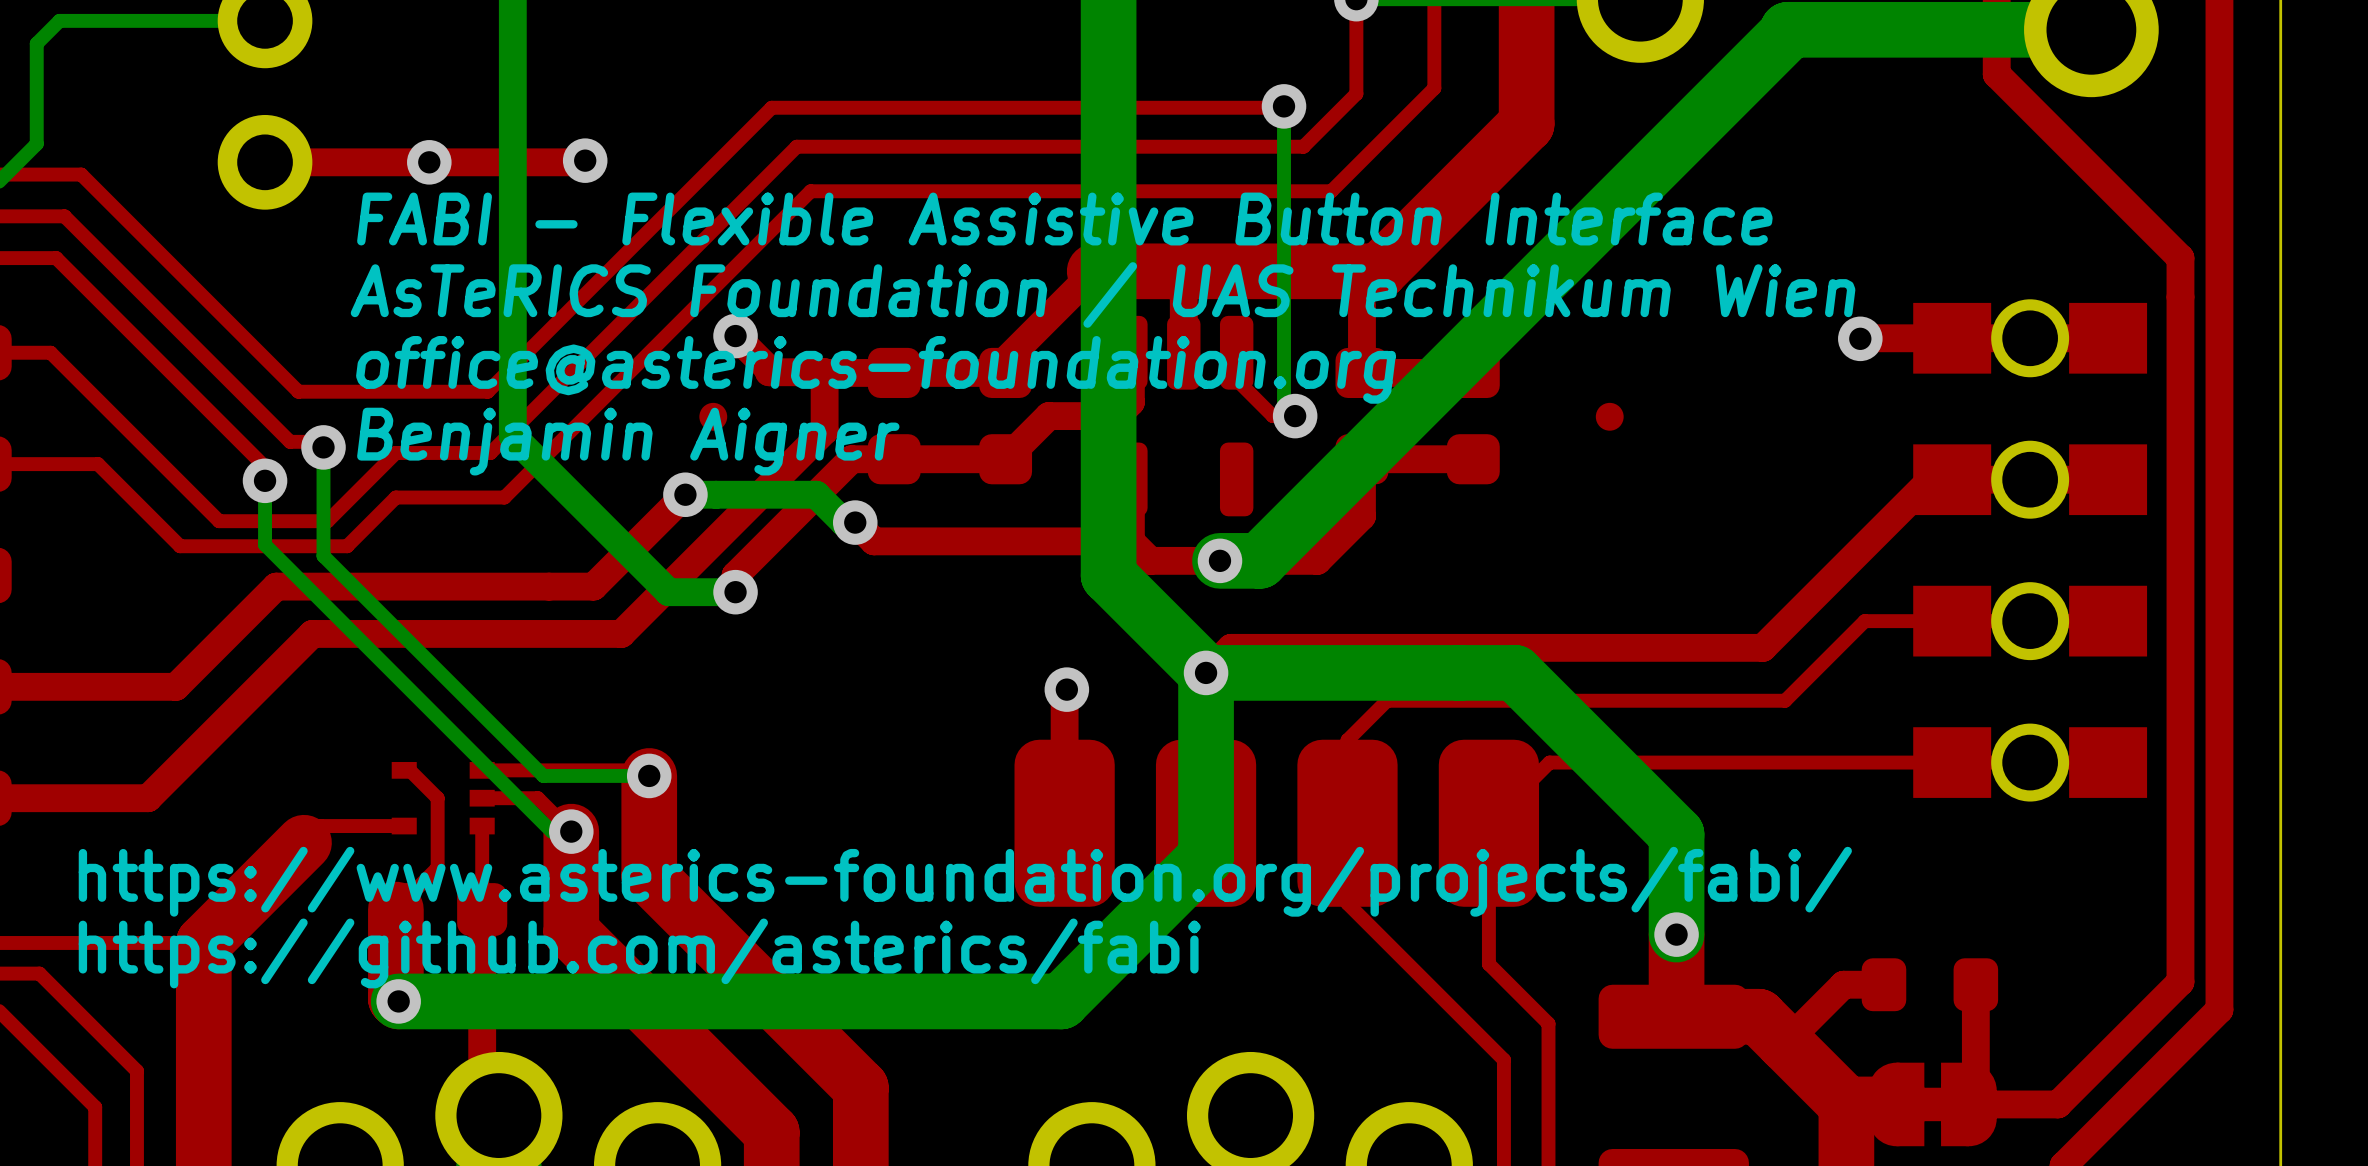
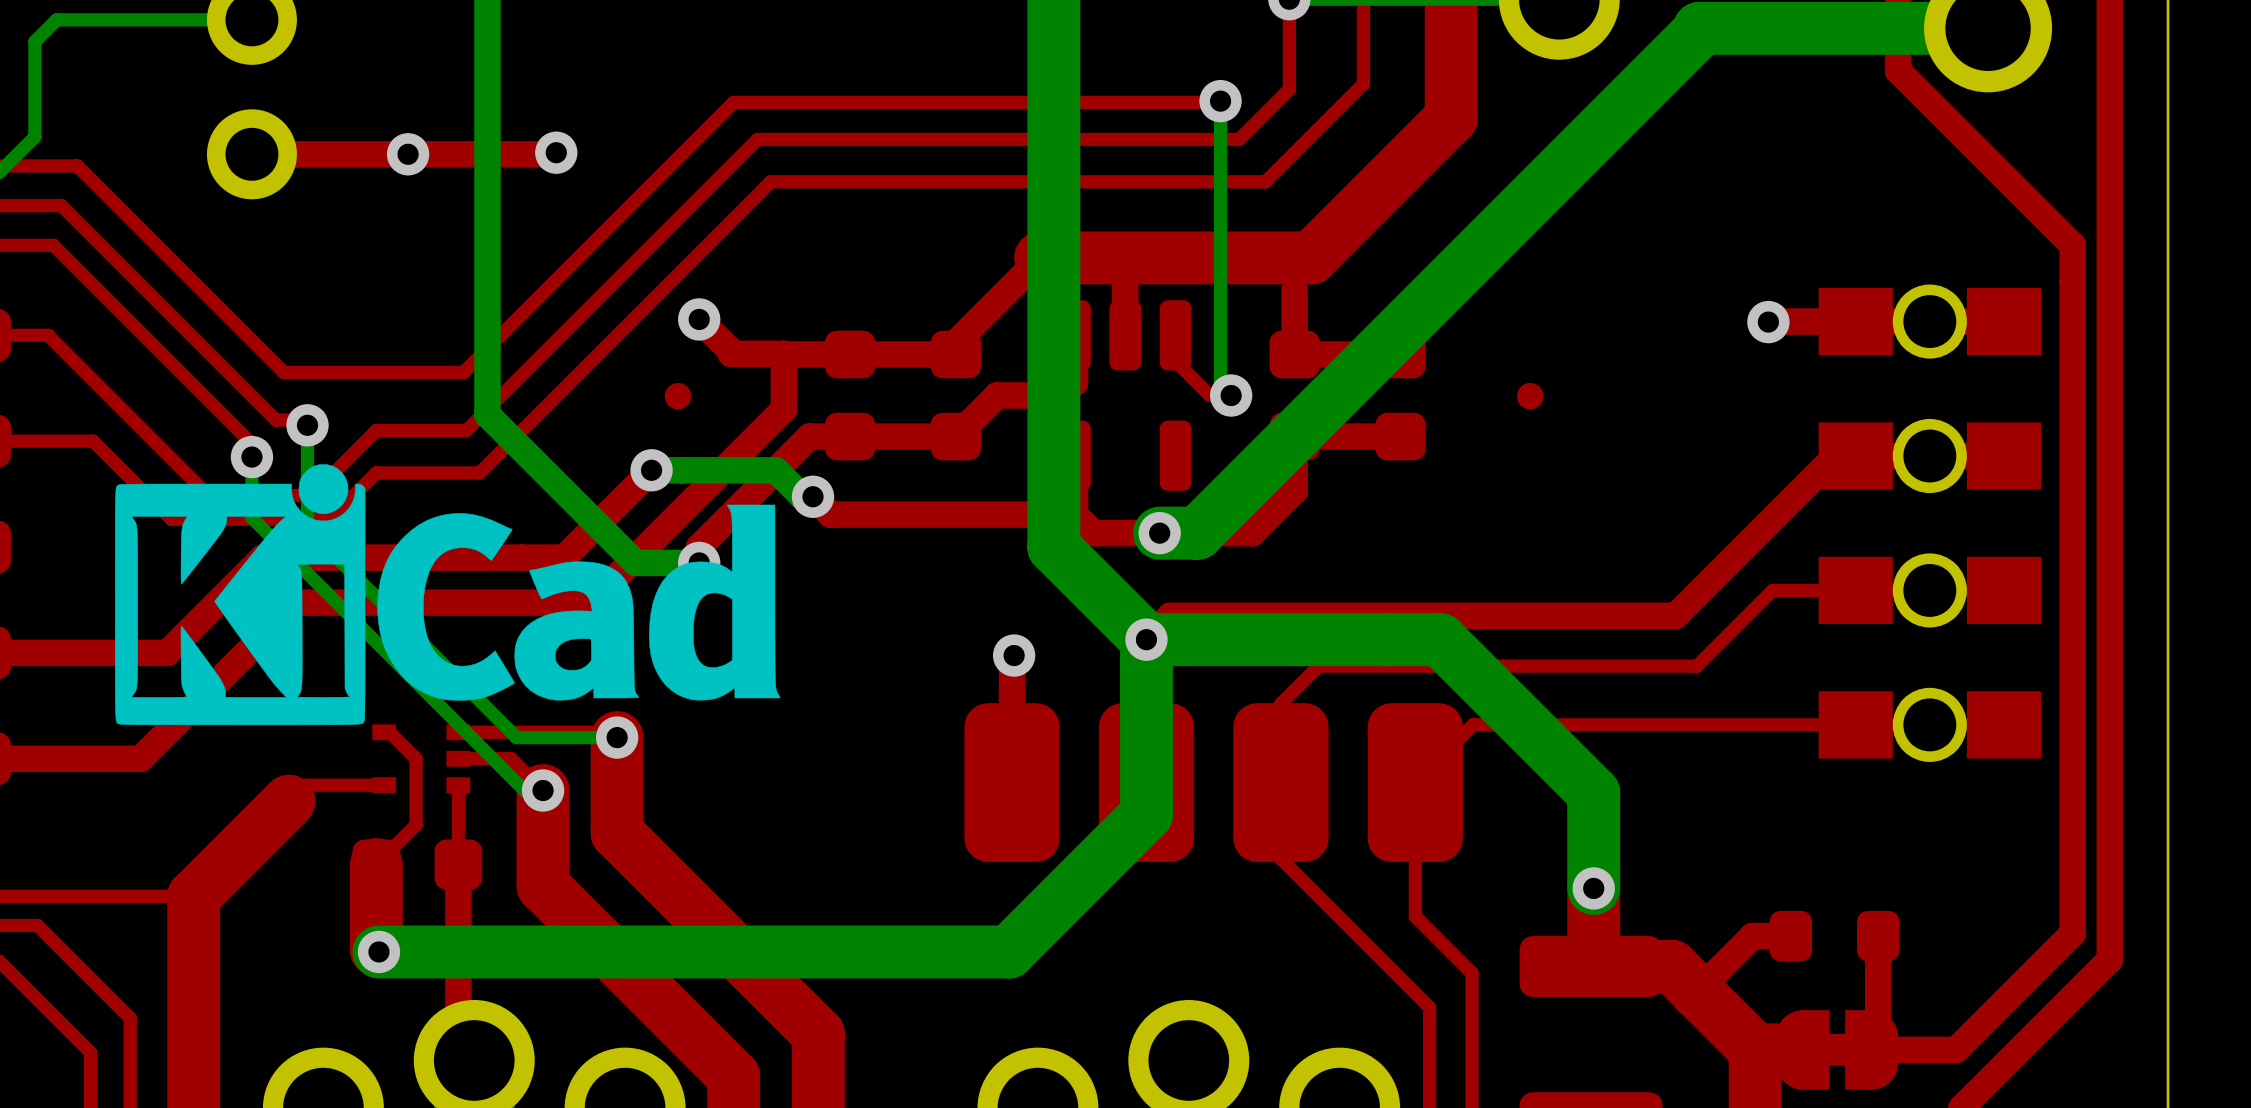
text: FABI - Flexible Assistive Button Interface (1064, 219) -> none
text: AsTeRICS Foundation / UAS Technikum Wien (1103, 294) -> none
text: office@asterics-foundation.org (875, 369) -> none
text: Benjamin Aigner (628, 441) -> none
drawing: none -> [114, 464, 781, 726]
text: https://www.asterics-foundation.org/projects/fabi/ (965, 881) -> none
text: https://github.com/asterics/fabi (639, 953) -> none

